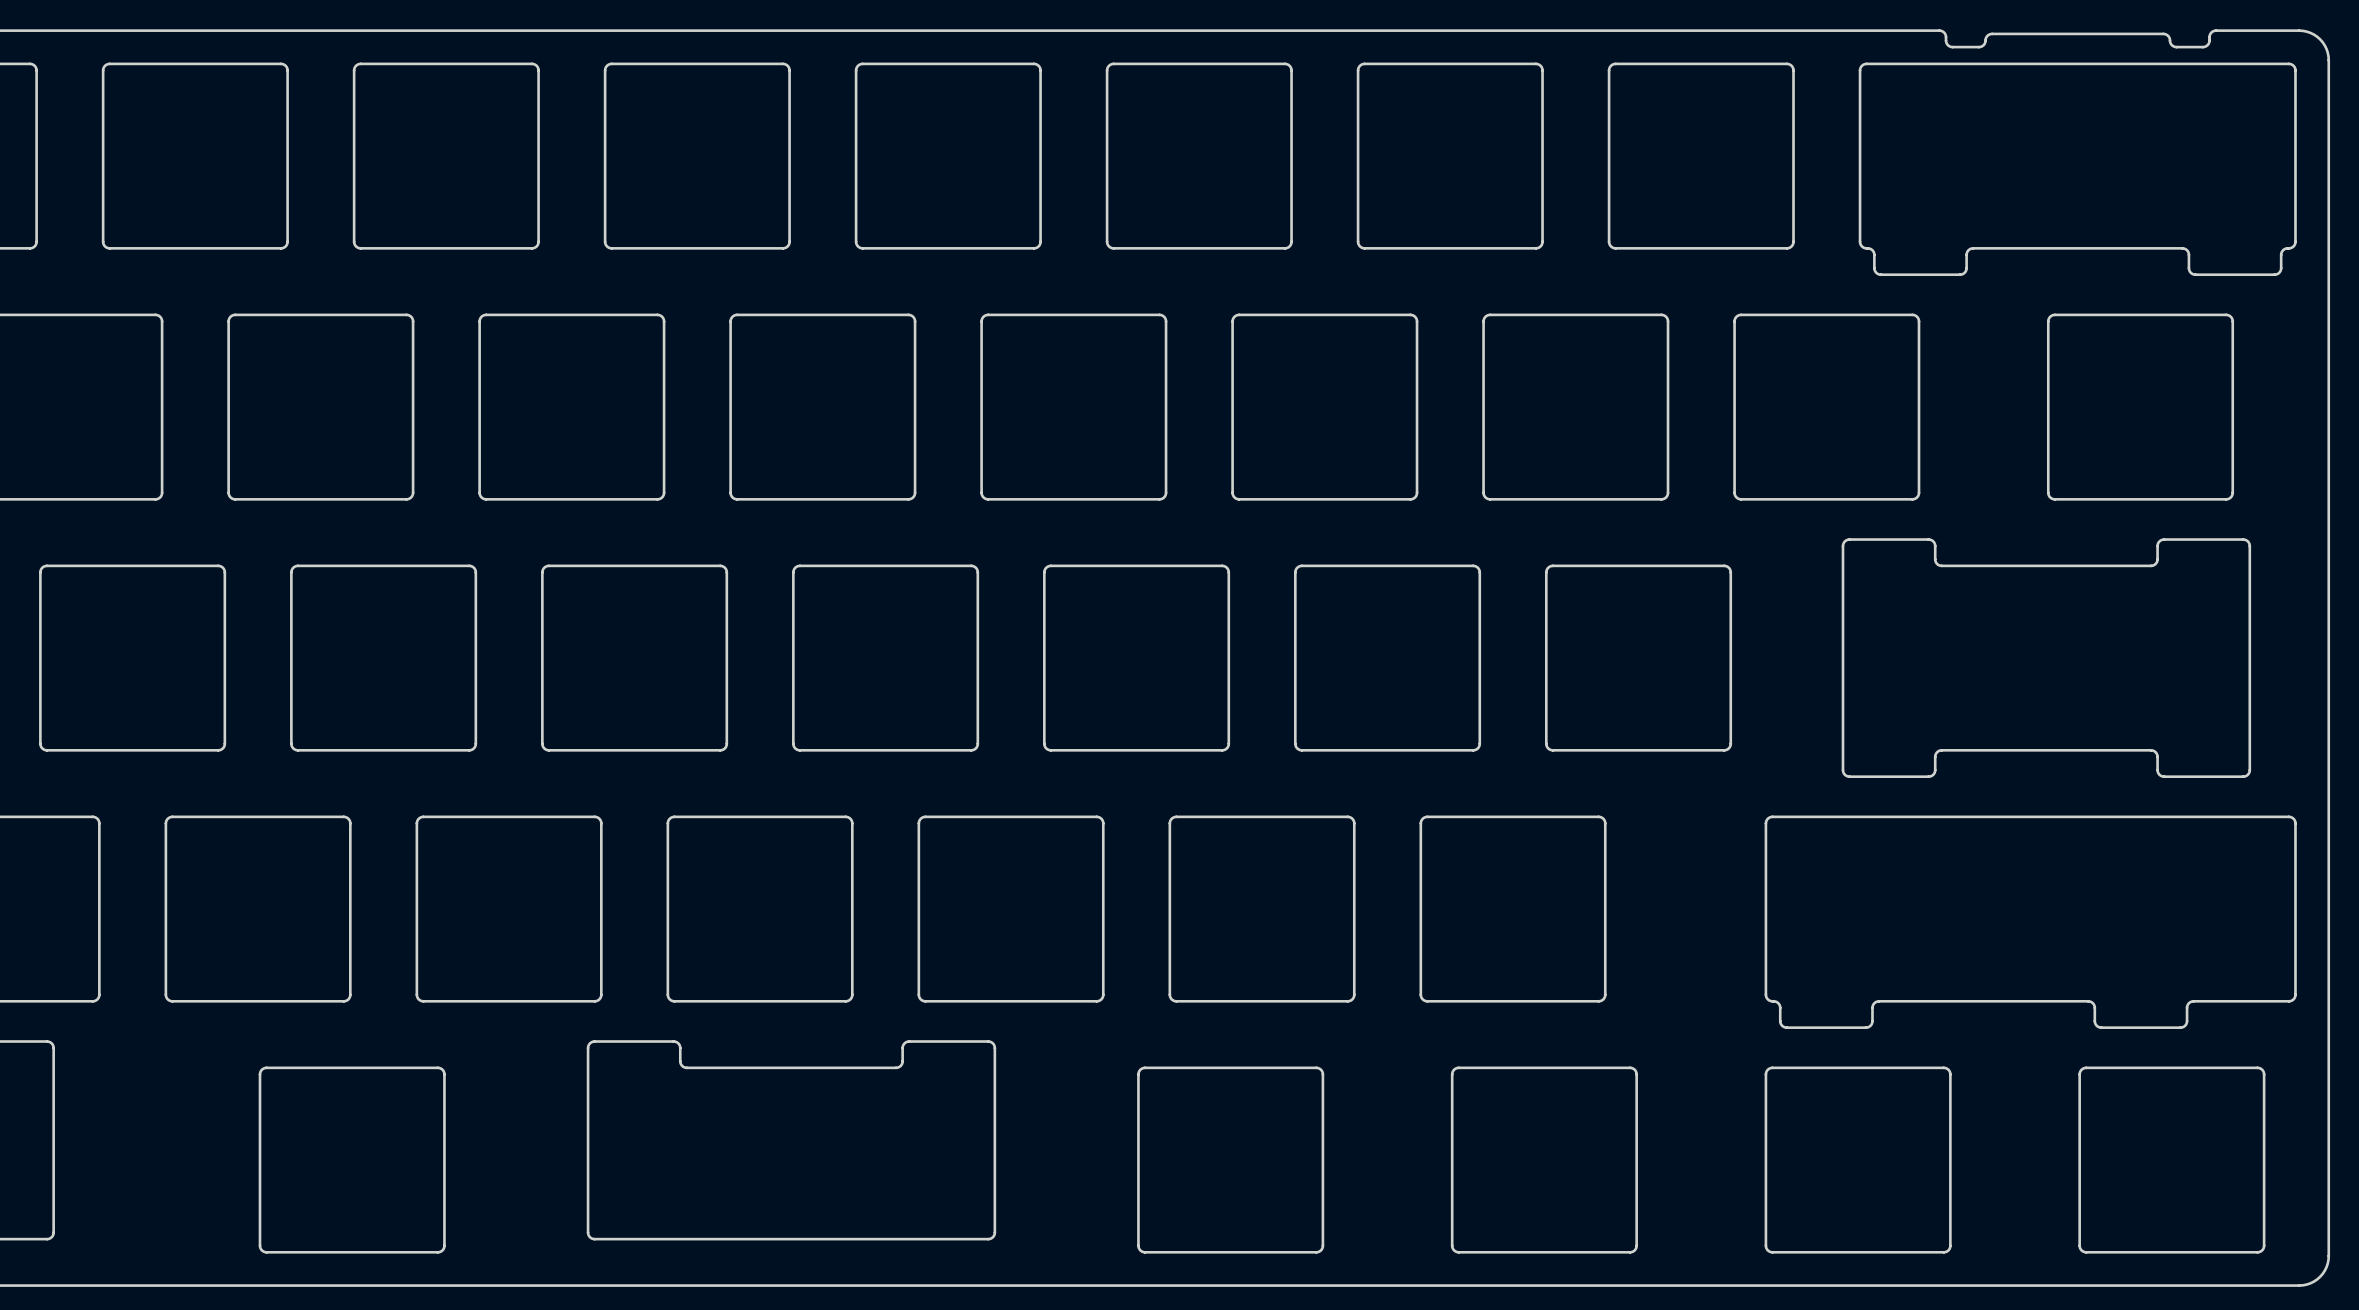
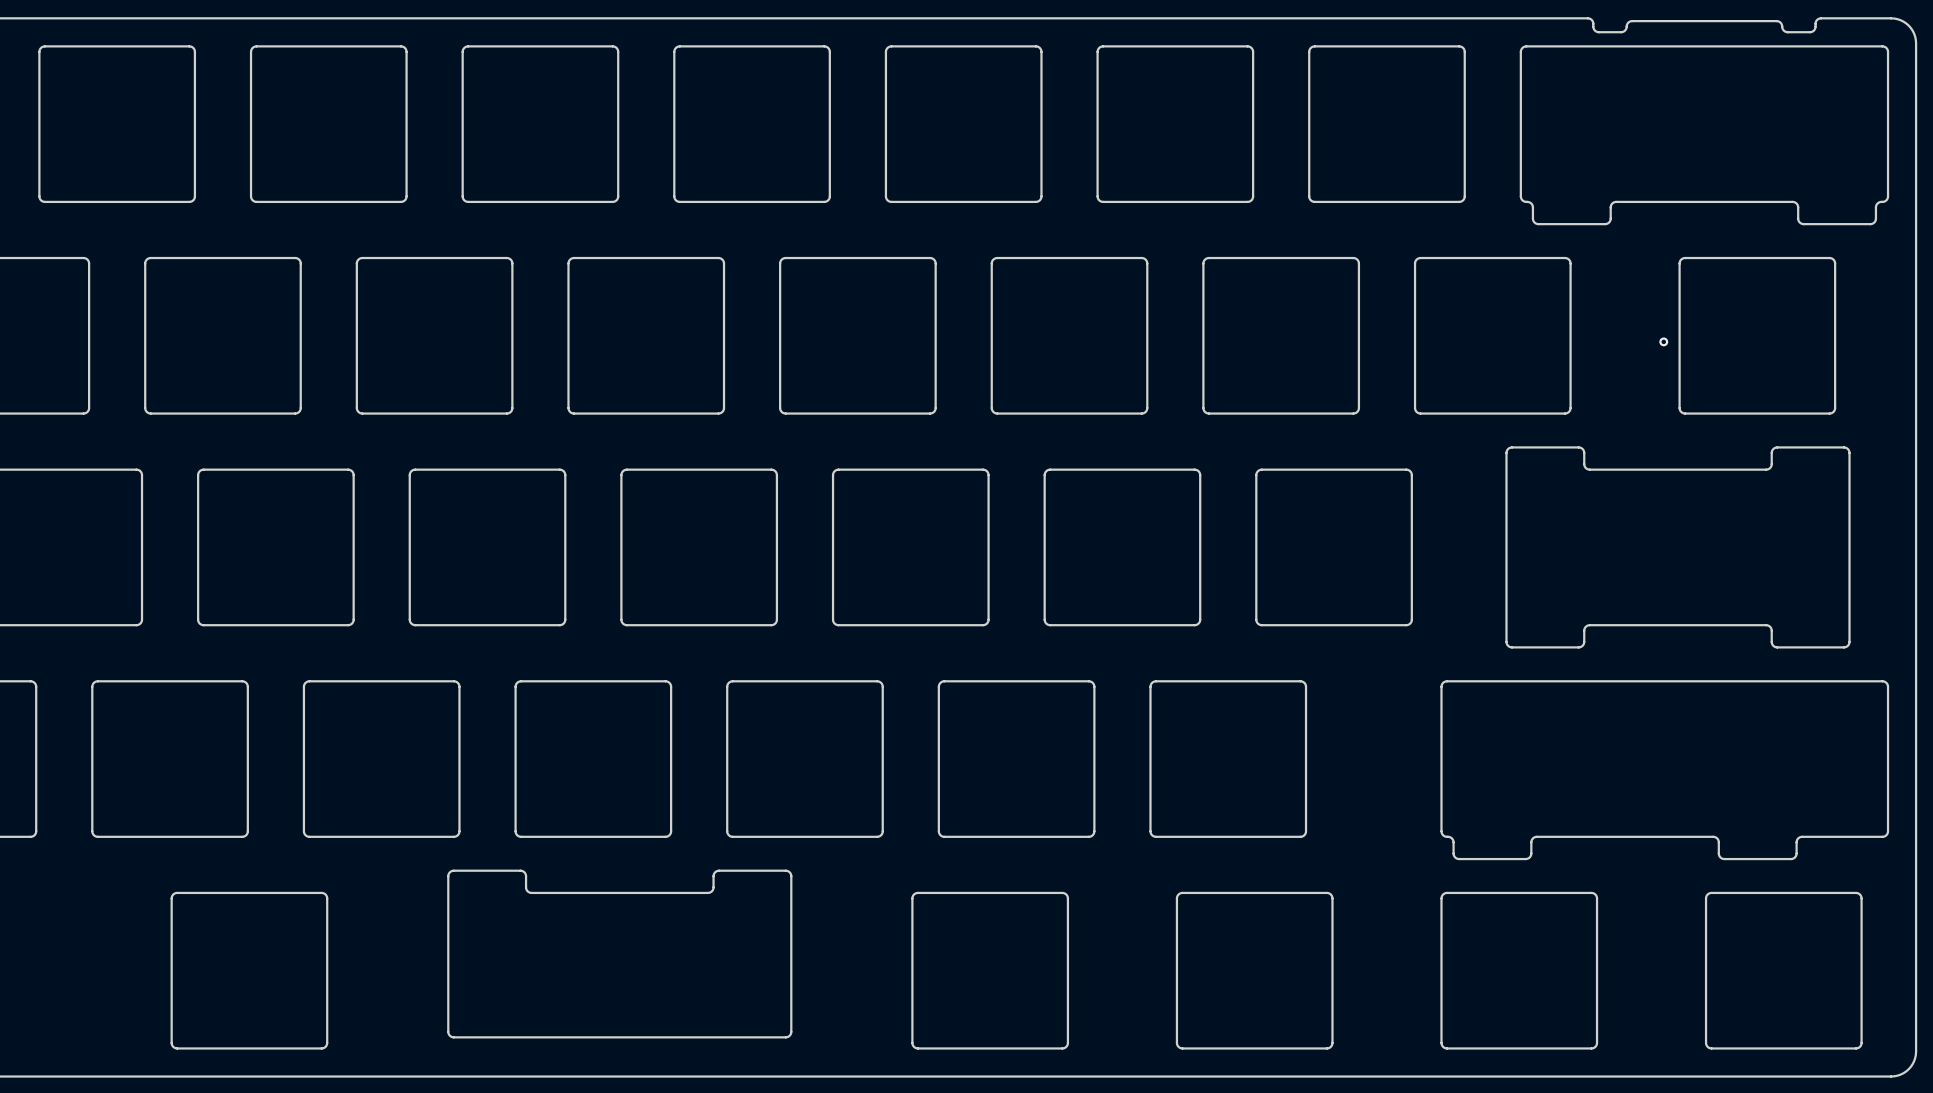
via: none -> (1663, 341)

